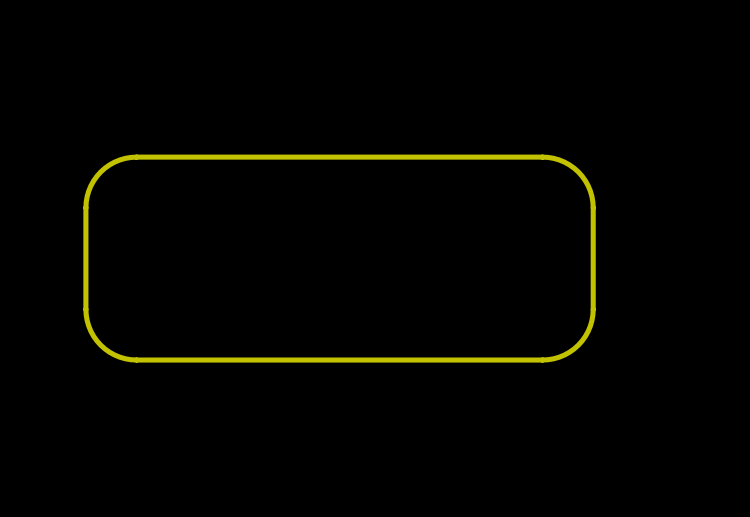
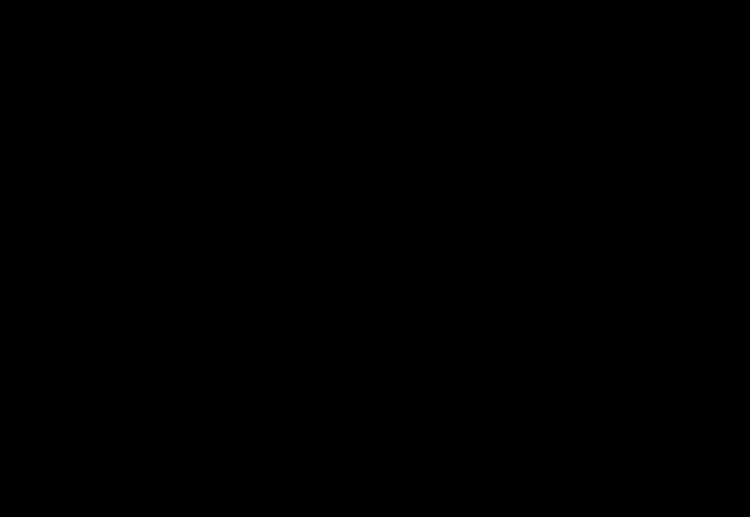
board edge: (136, 157) (542, 157) (559, 159) (574, 168) (582, 176) (591, 196) (593, 309) (590, 326) (582, 340) (574, 348) (564, 355) (548, 359) (136, 360) (119, 357) (100, 345) (90, 331) (87, 320) (86, 202) (90, 185) (100, 171) (114, 162) (136, 157) -> none

